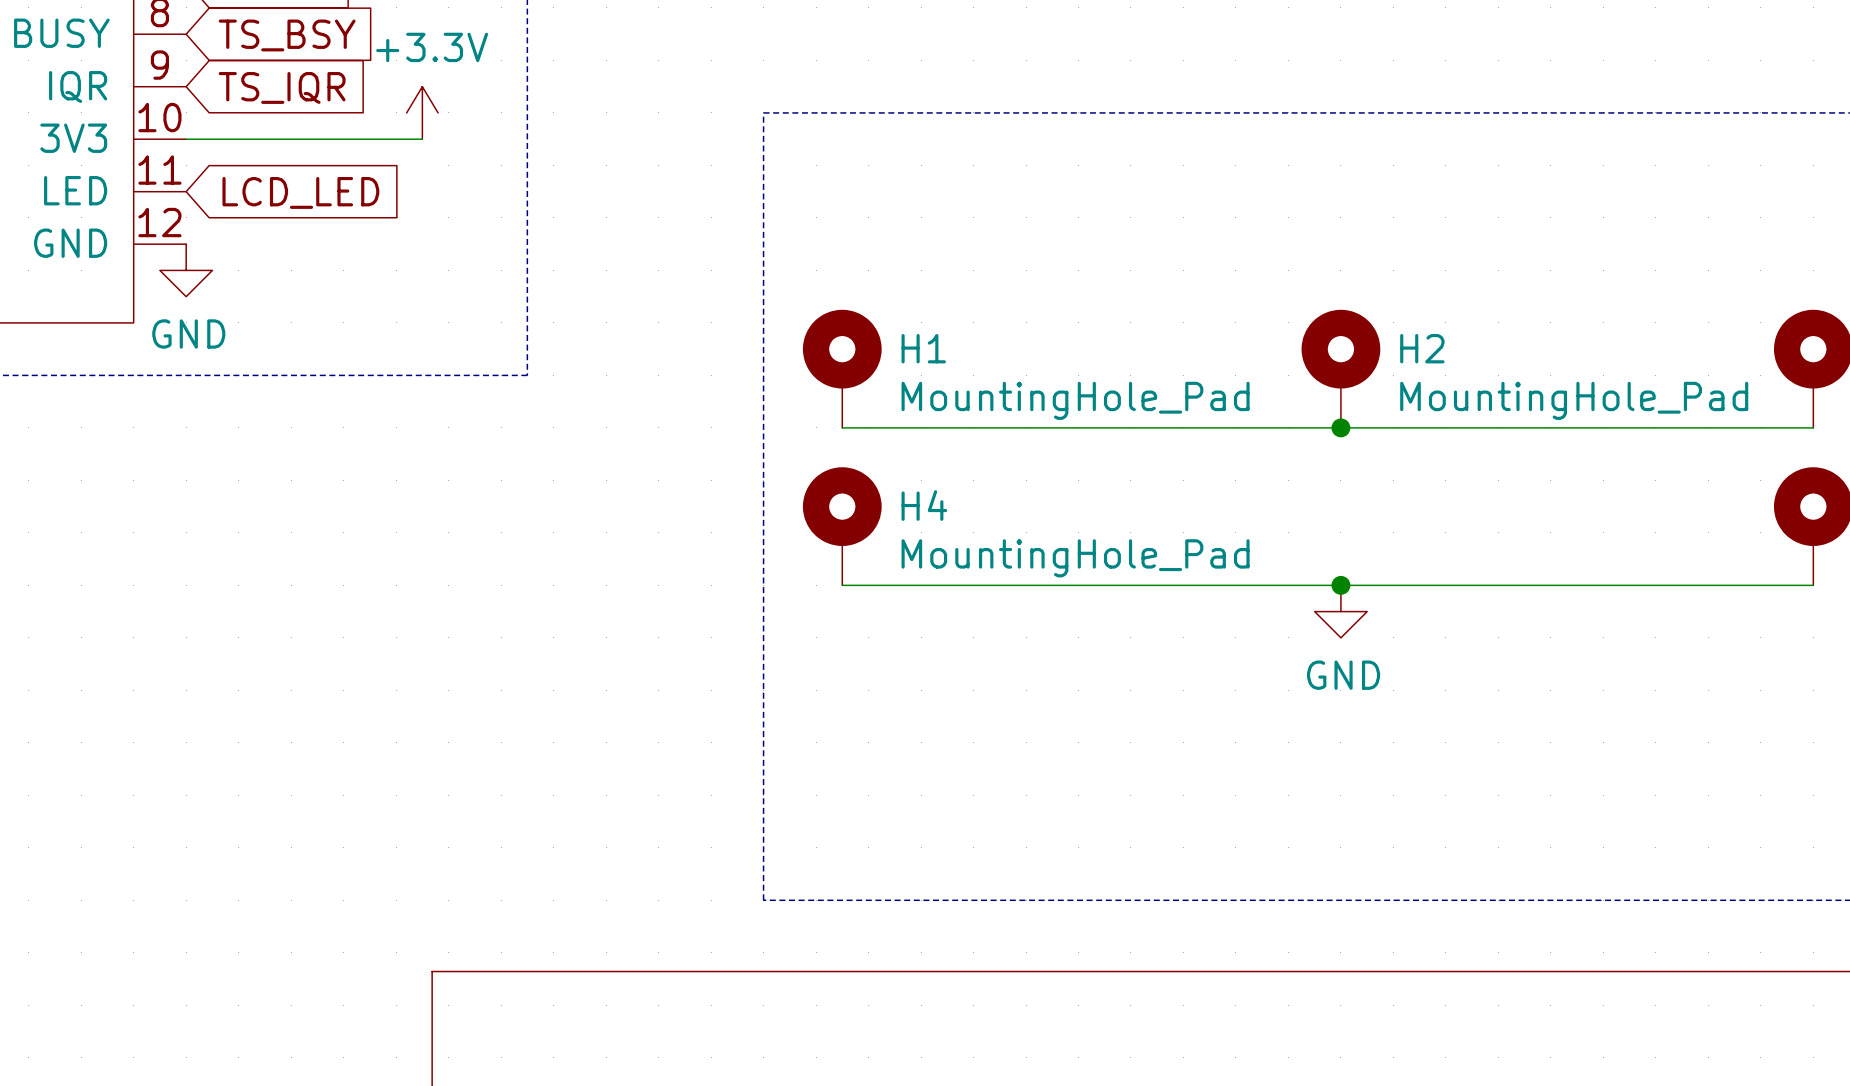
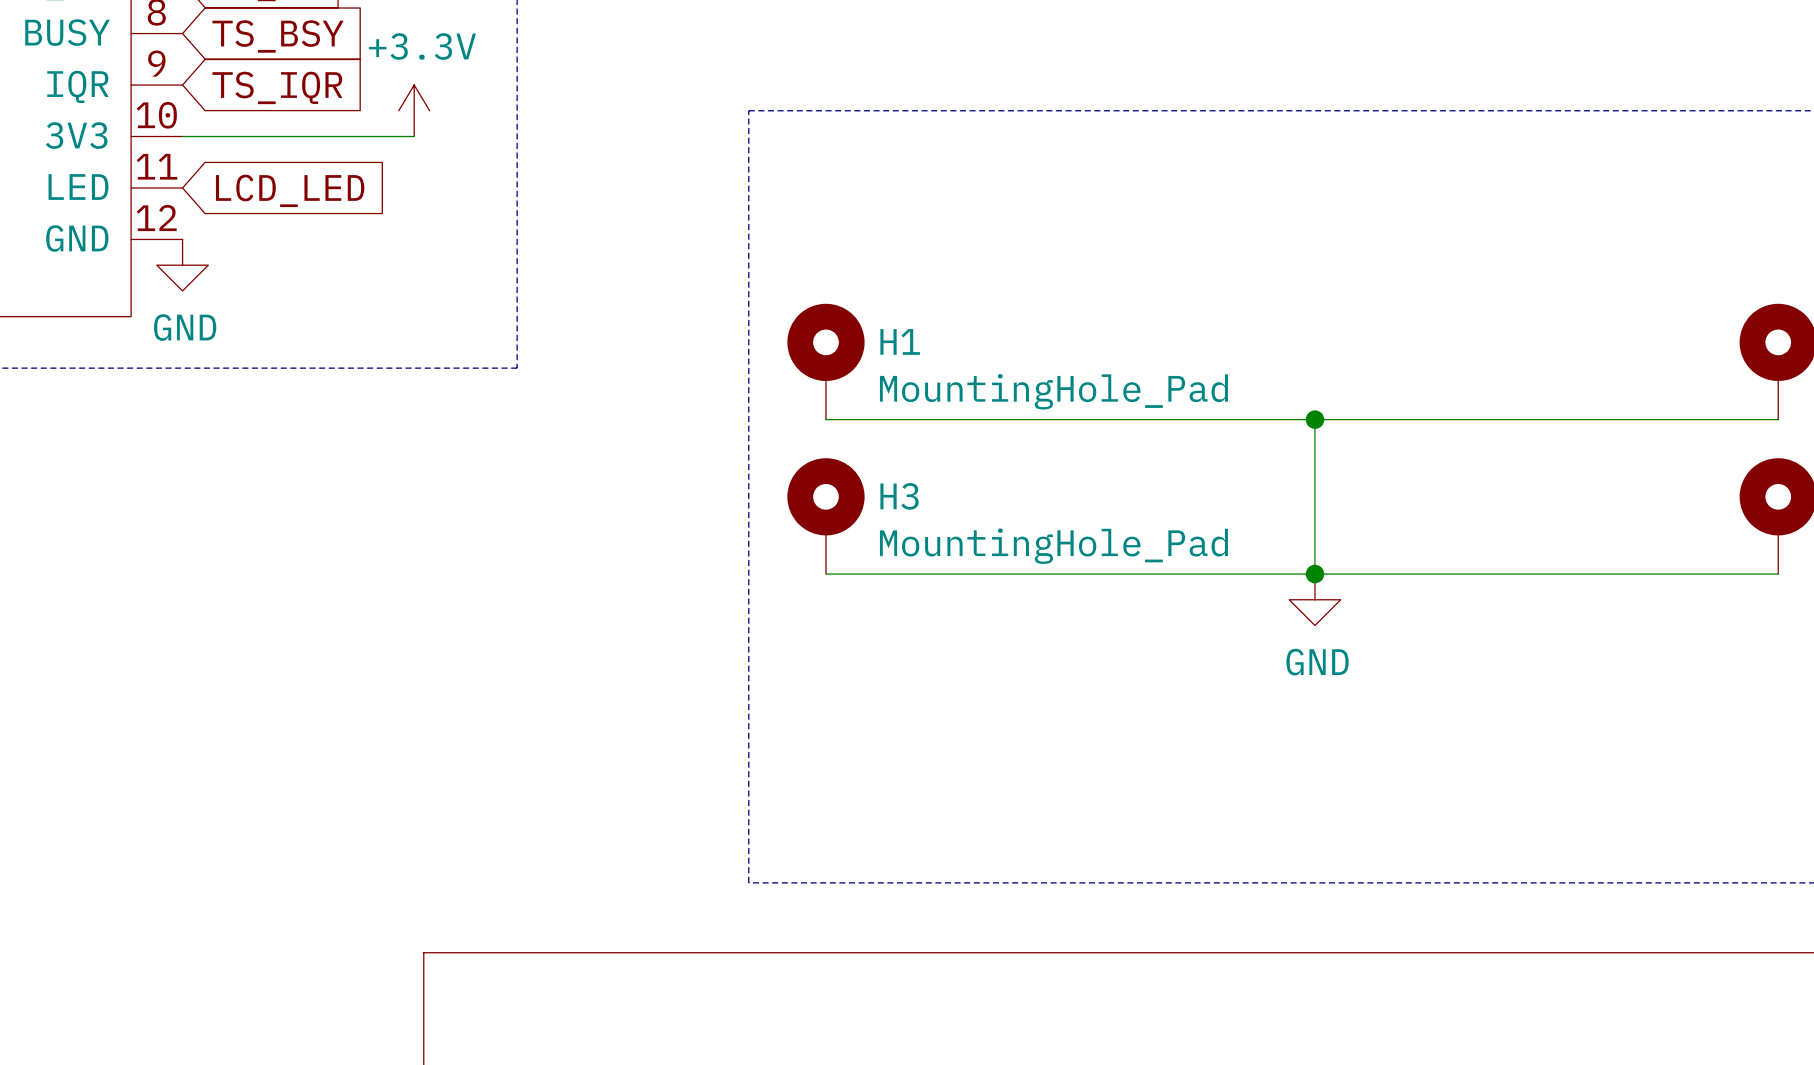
H2: MountingHole_Pad (1340, 368) -> none
wire: none -> (1314, 419) (1314, 574)
H4 name: H4 (924, 505) -> H3 (899, 496)

